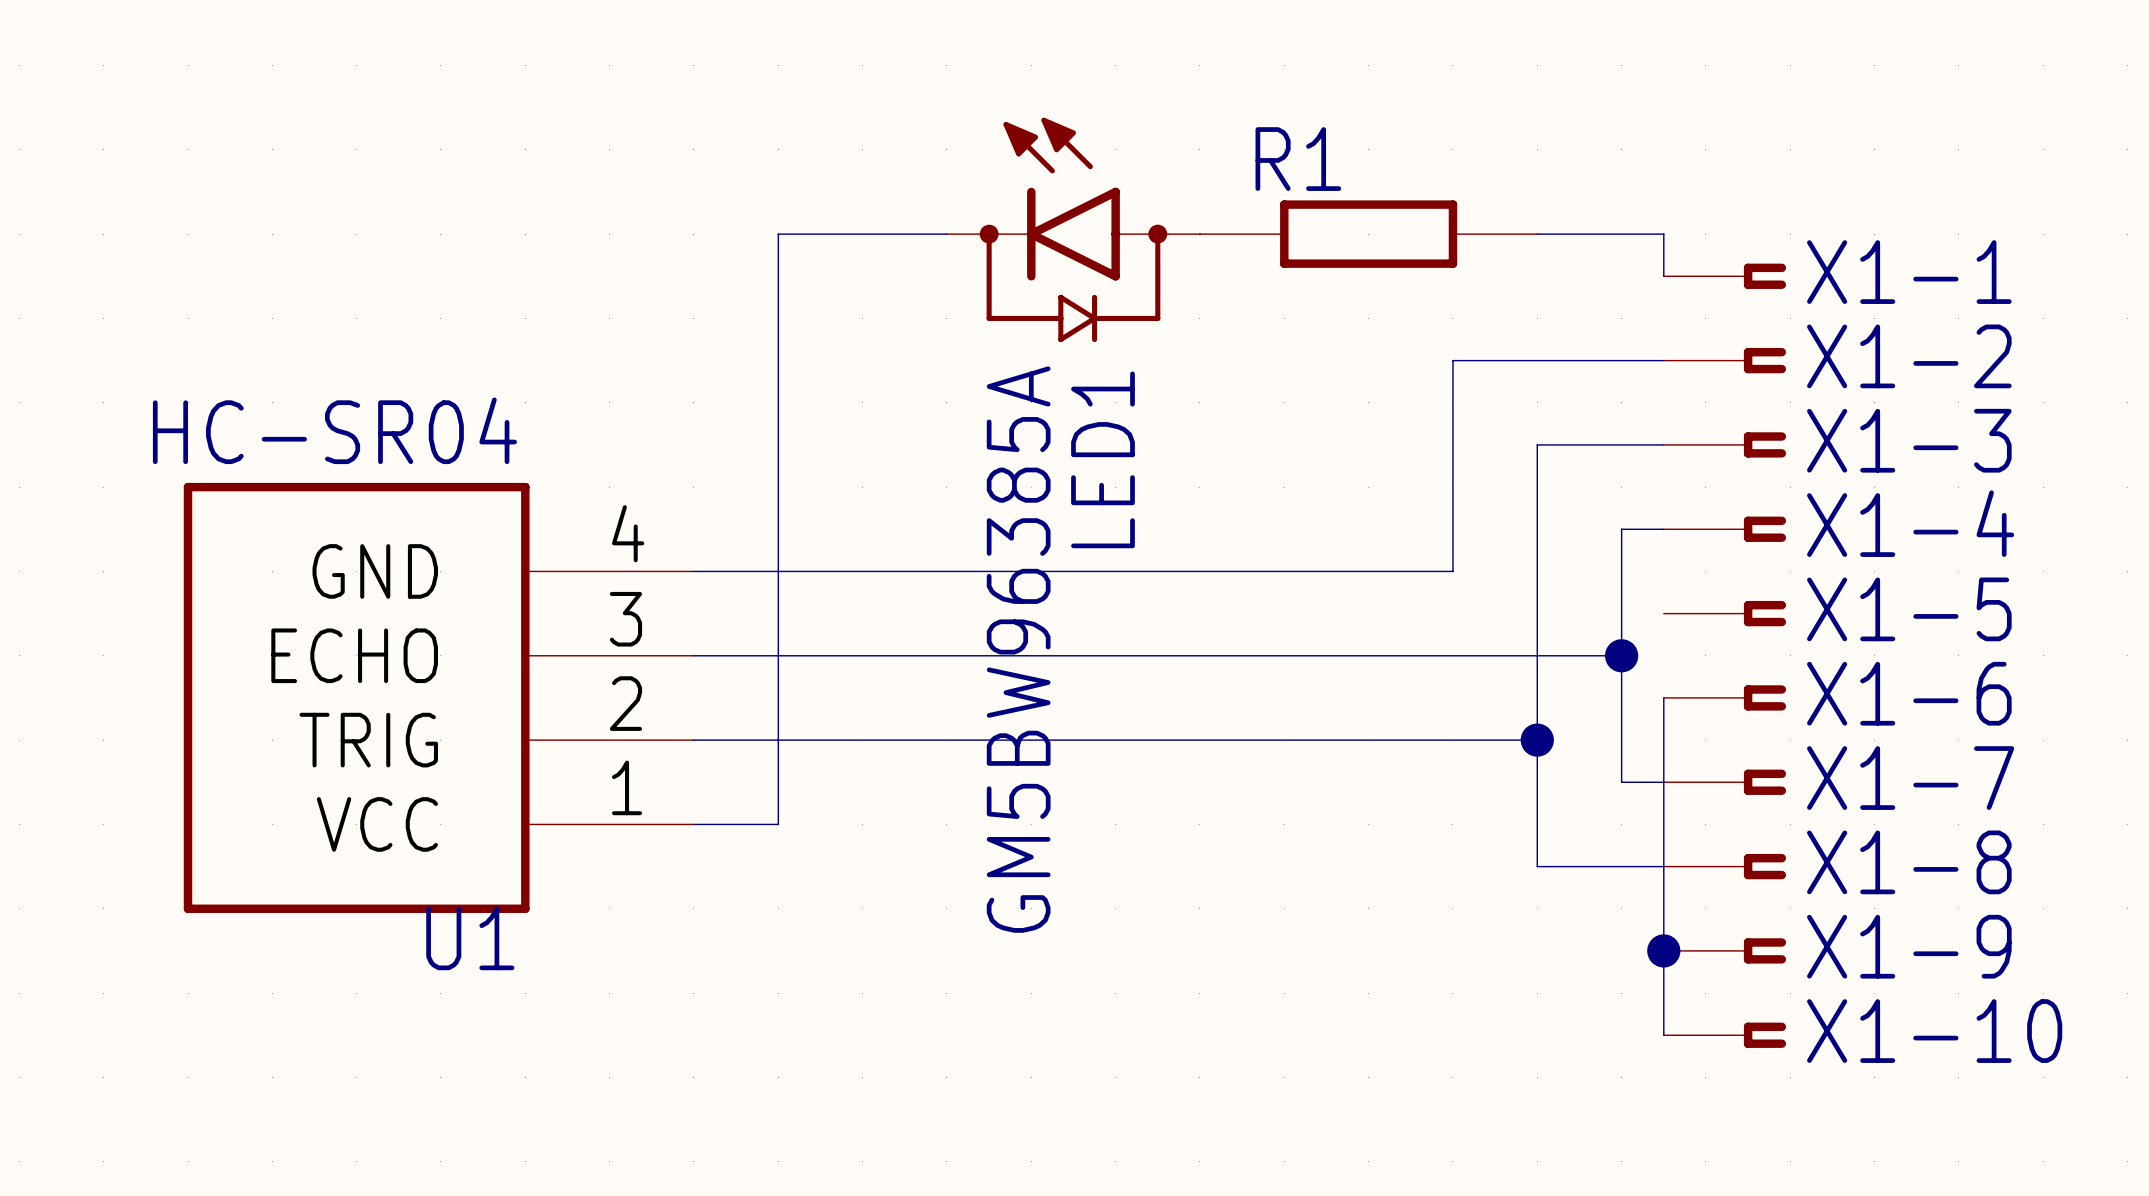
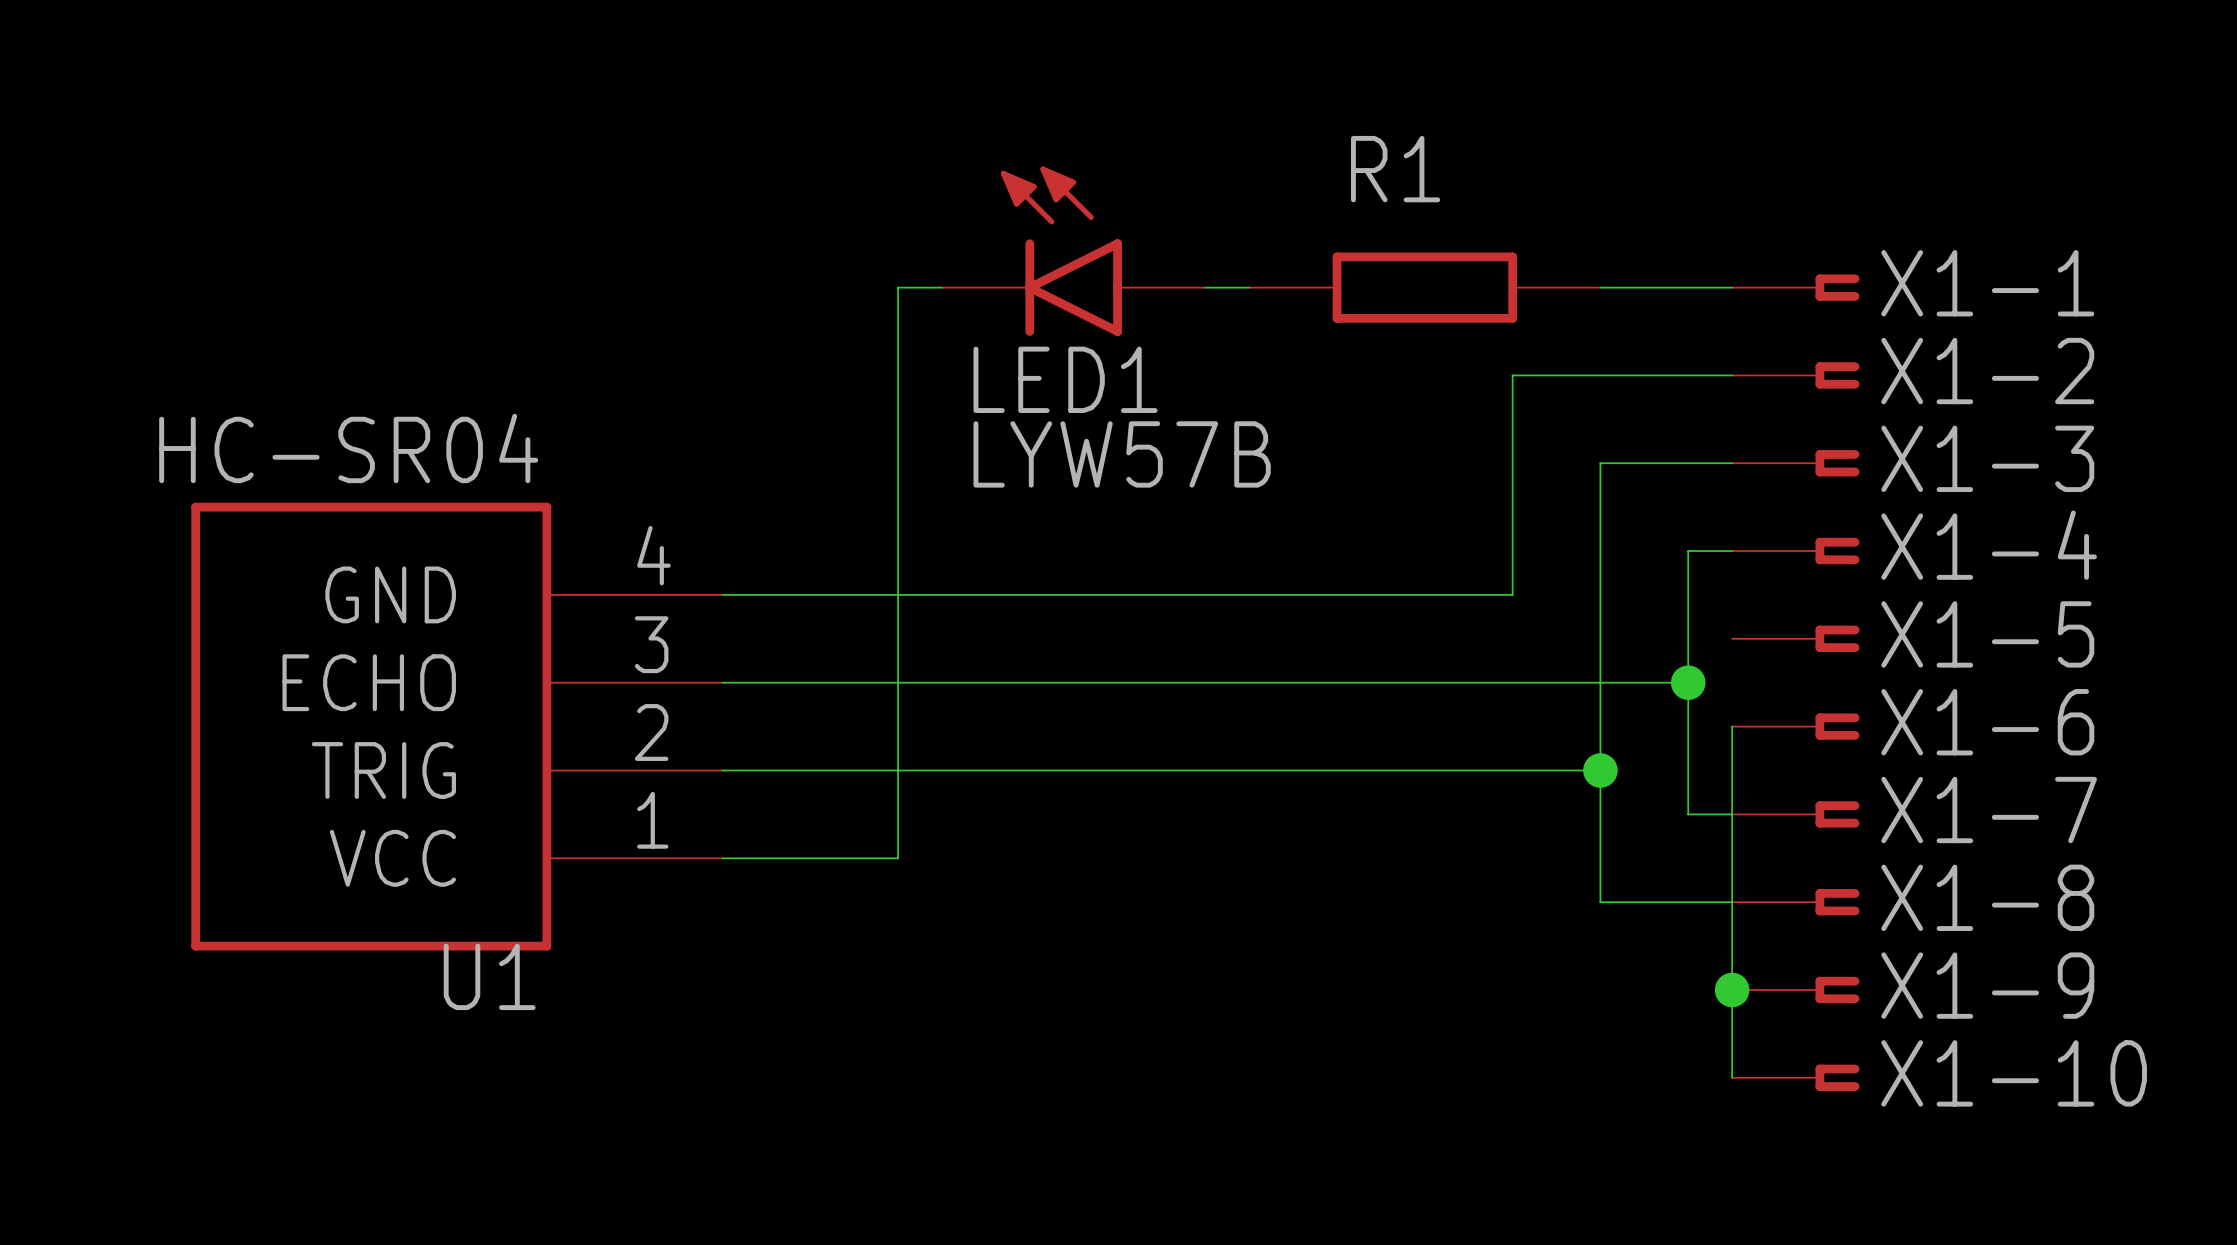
LED1 symbol: [946, 117, 1200, 343] -> [941, 166, 1206, 336]
R1 name position: R1 (1298, 159) -> R1 (1395, 169)
wire: (946, 234) (778, 234) (778, 824) -> (941, 287) (898, 287) (898, 858) (810, 858)
R1 position: (1368, 234) -> (1424, 287)
wire: (1537, 234) (1663, 234) (1663, 276) -> (1600, 287) (1732, 287)
wire: none -> (1205, 287) (1249, 287)
LED1 name position: LED1 (1102, 459) -> LED1 (1065, 379)
LED1 value: GM5BW96385A (1018, 649) -> LYW57B (1122, 454)

